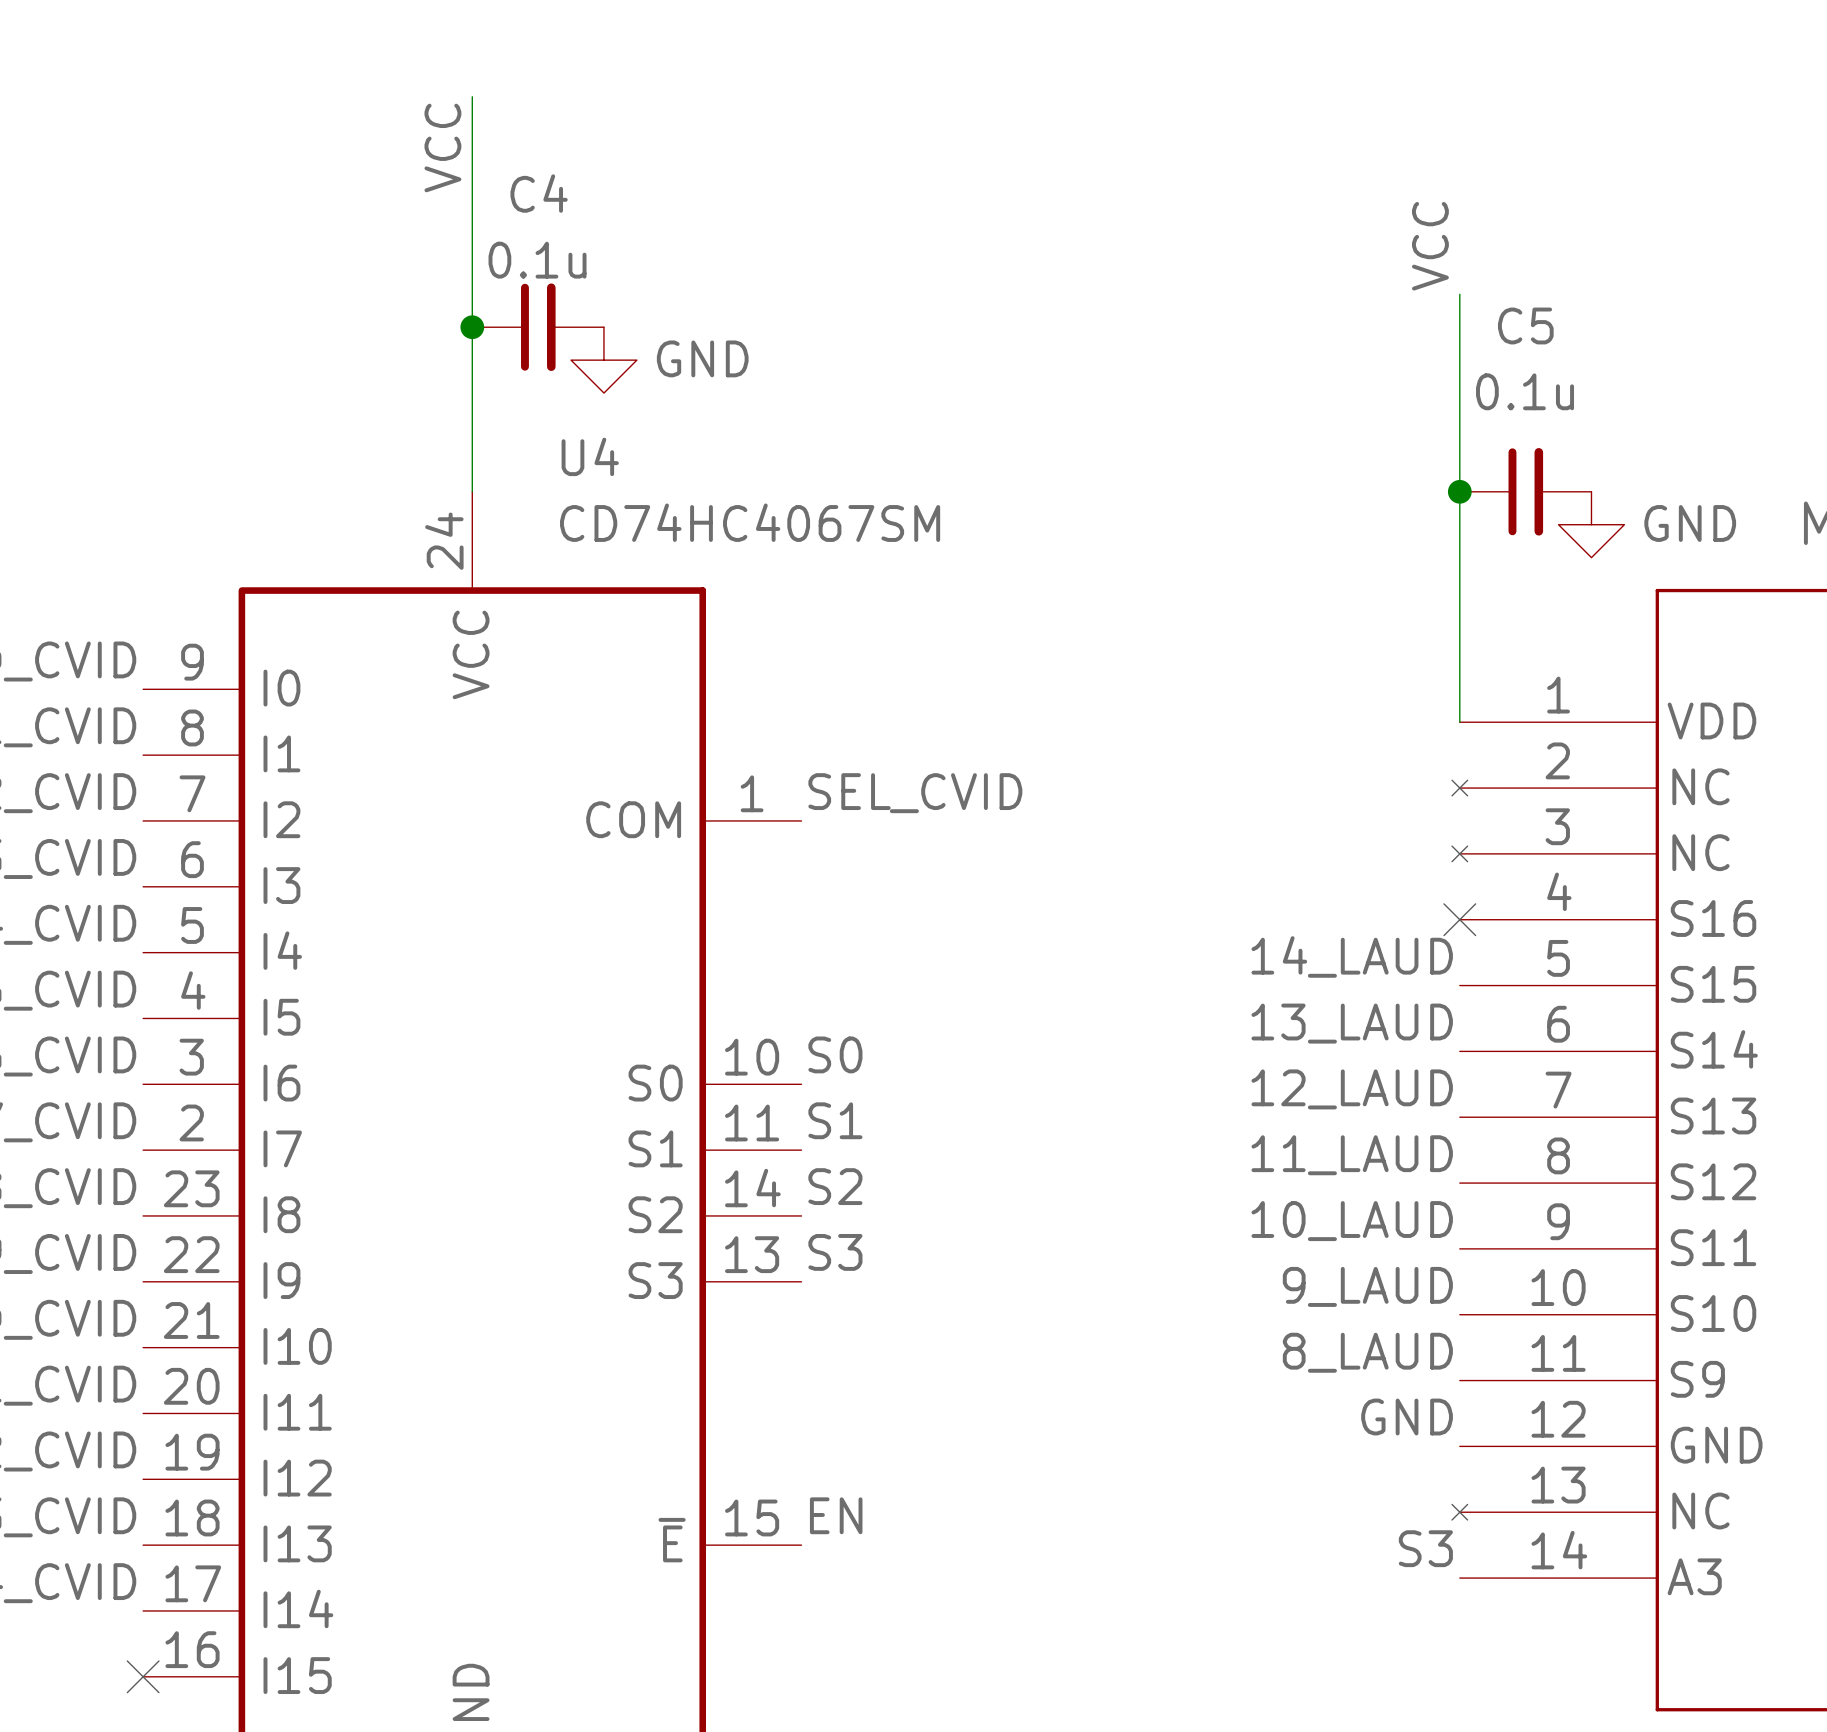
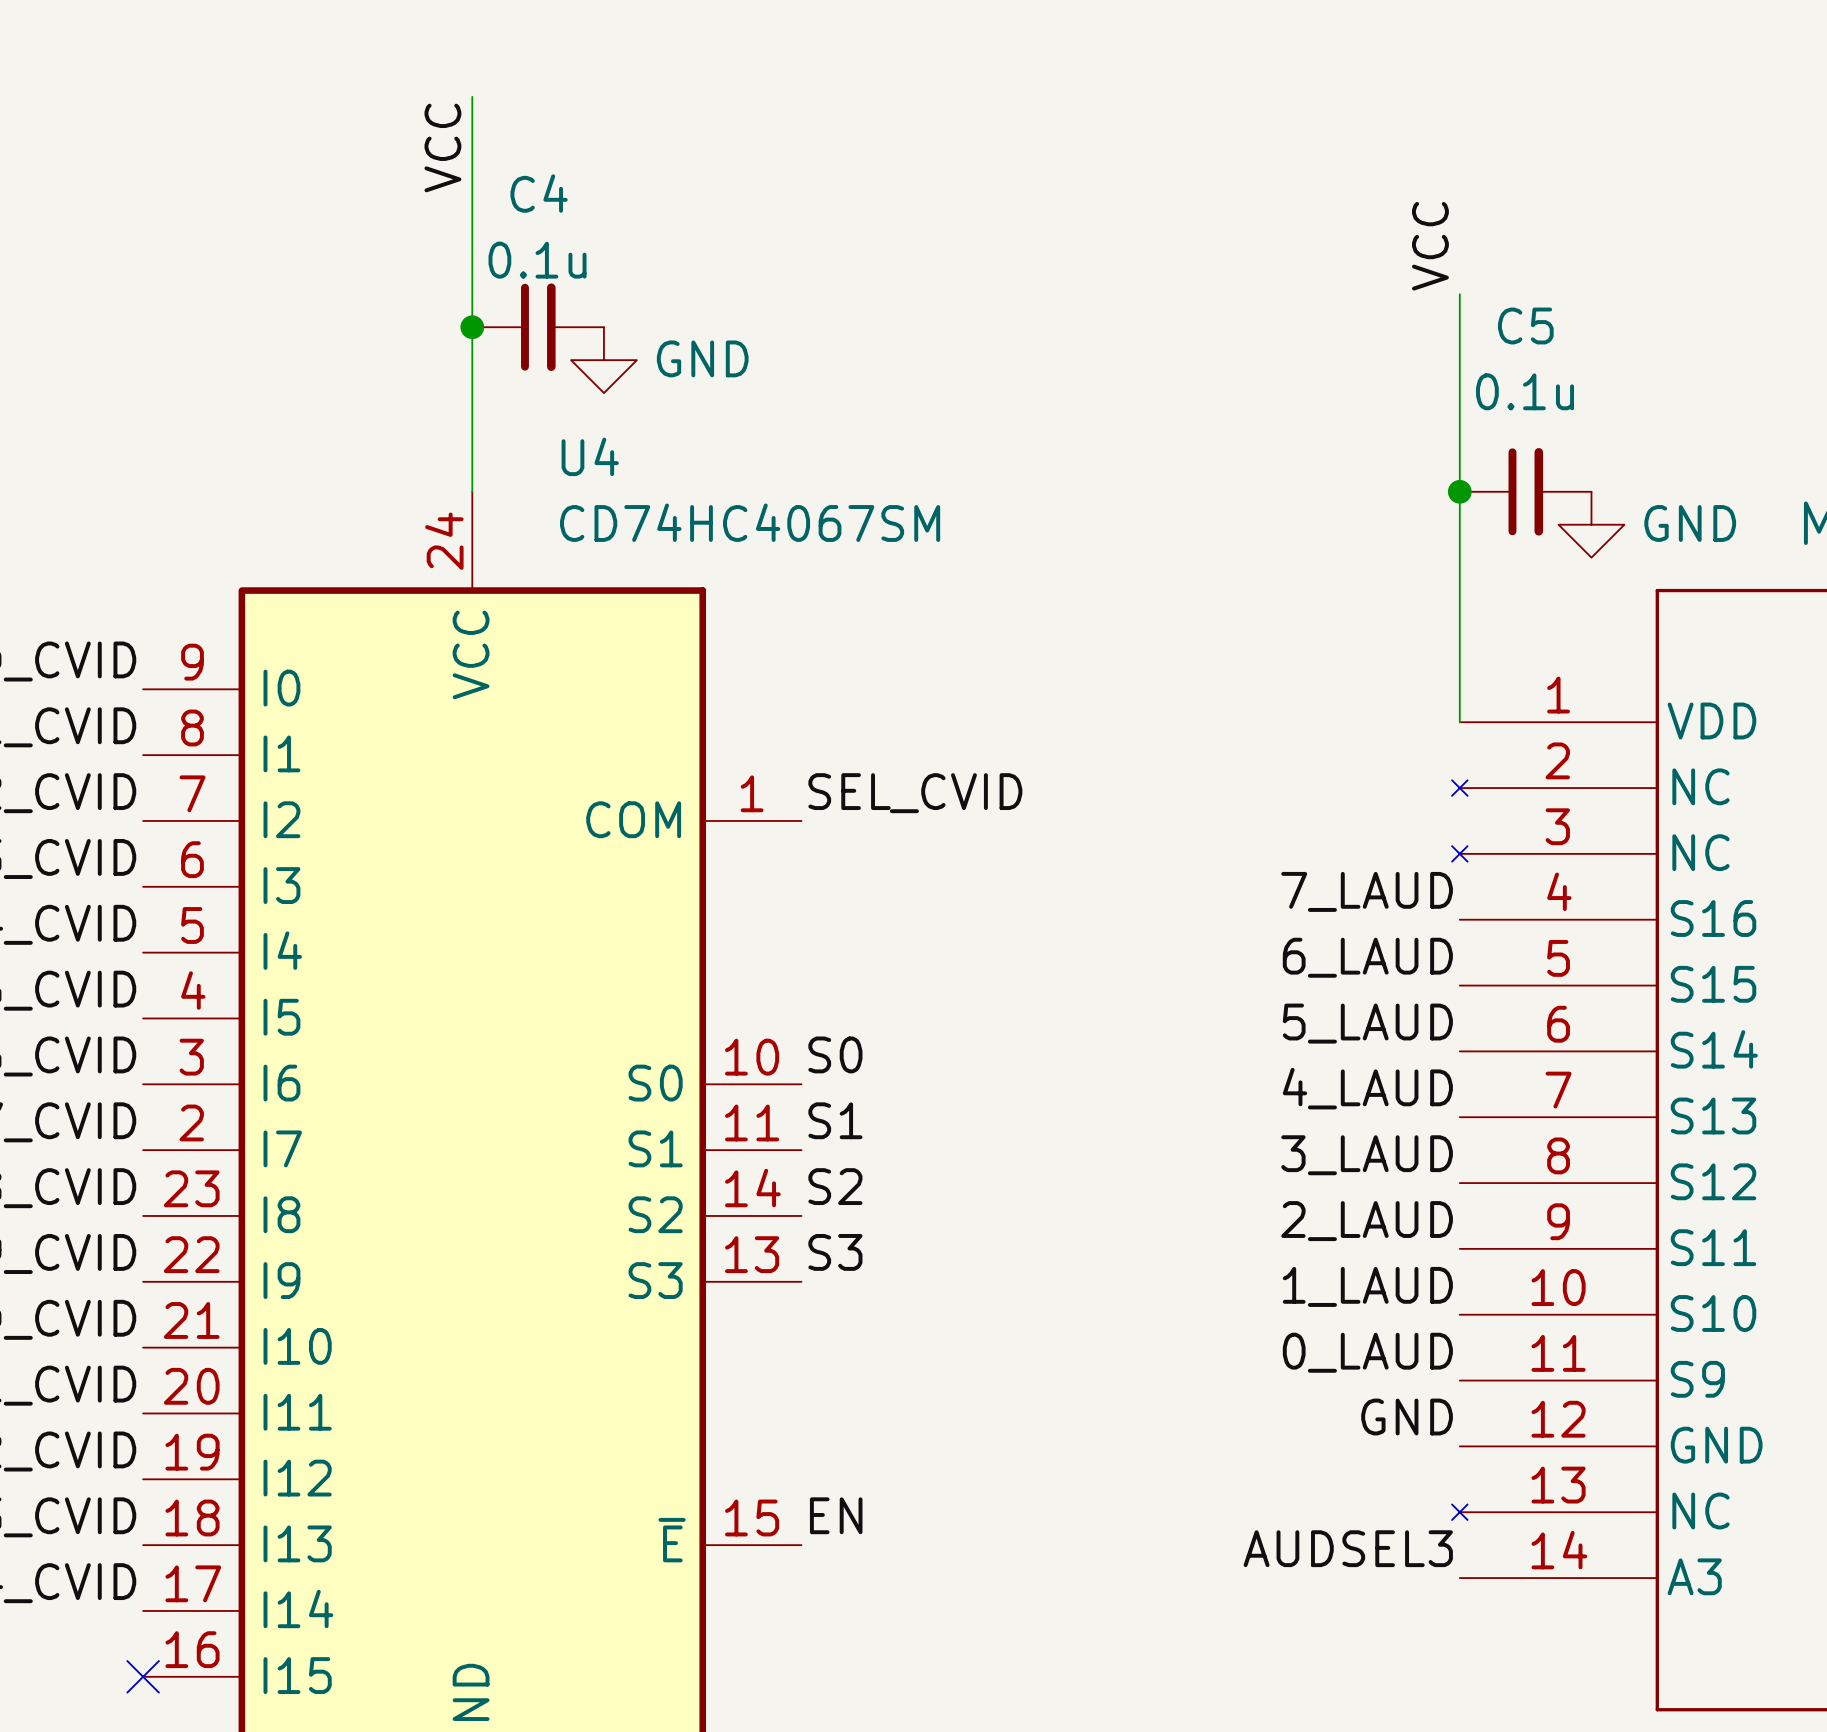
label: none -> 7_LAUD (1367, 891)
no-connect mark: (1459, 919) -> none
label: 14_LAUD (1352, 956) -> 6_LAUD (1367, 957)
label: 13_LAUD (1352, 1023) -> 5_LAUD (1367, 1023)
label: 12_LAUD (1352, 1089) -> 4_LAUD (1367, 1088)
label: 11_LAUD (1352, 1155) -> 3_LAUD (1367, 1155)
label: 10_LAUD (1352, 1221) -> 2_LAUD (1367, 1221)
label: 9_LAUD (1367, 1286) -> 1_LAUD (1367, 1286)
label: 8_LAUD (1367, 1352) -> 0_LAUD (1367, 1352)
label: S3 (1425, 1548) -> AUDSEL3 (1348, 1548)

